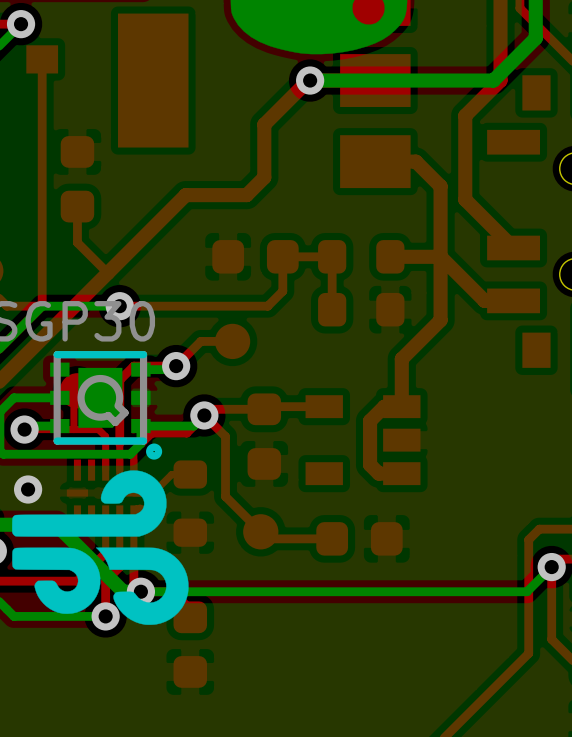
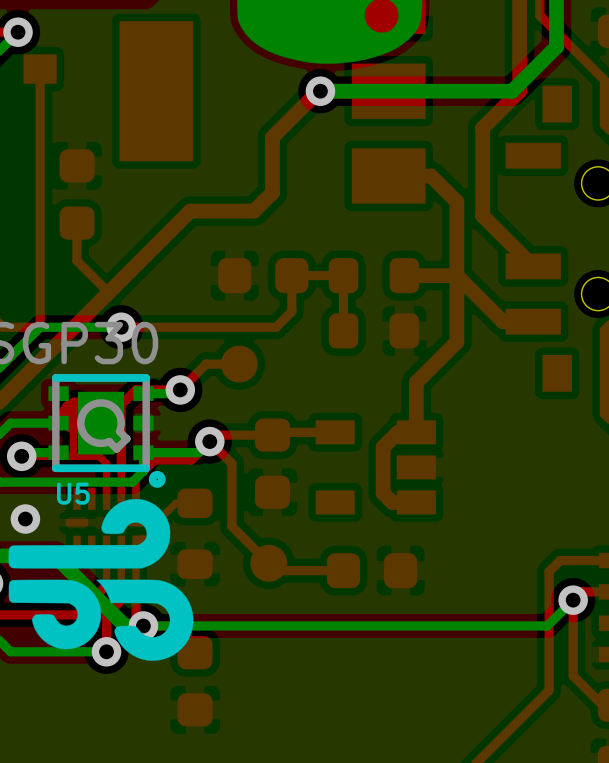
U5 name: none -> U5 (73, 493)

